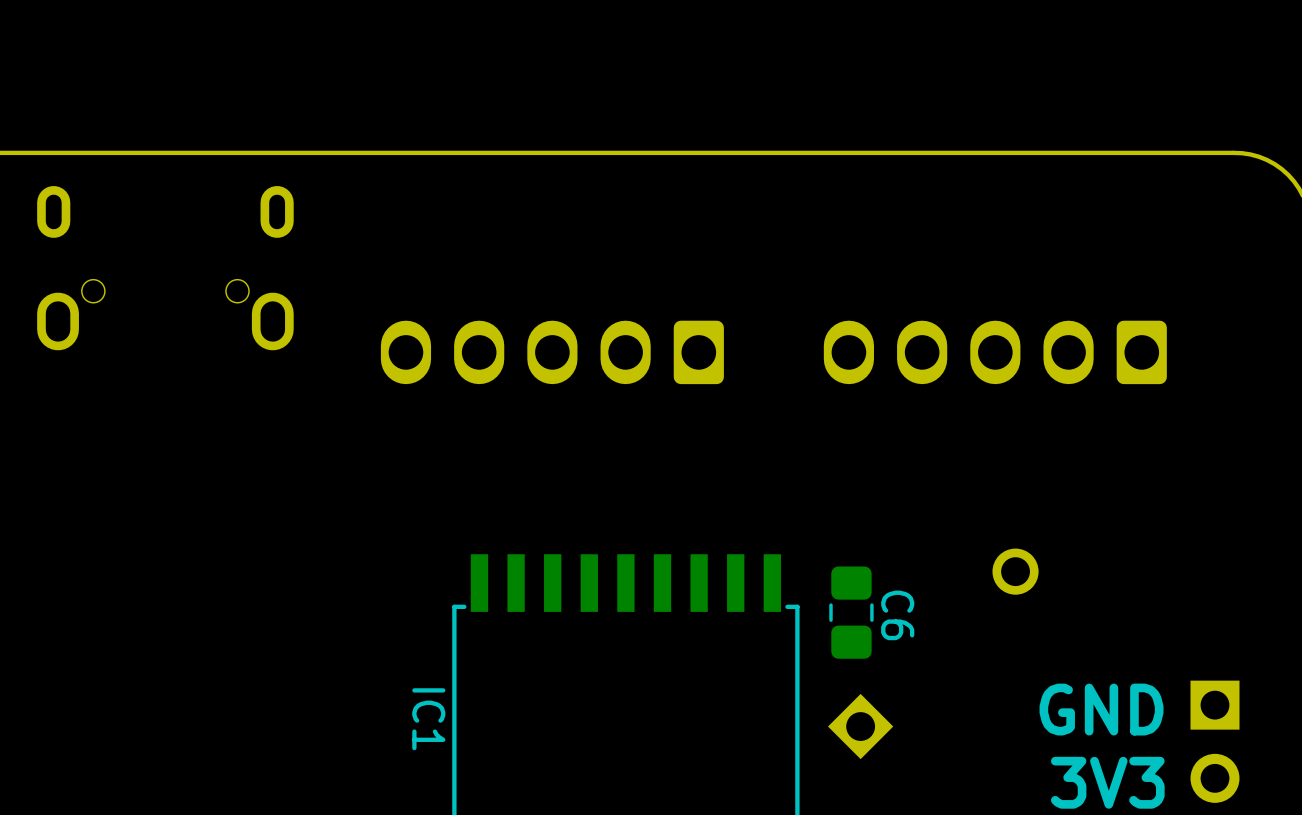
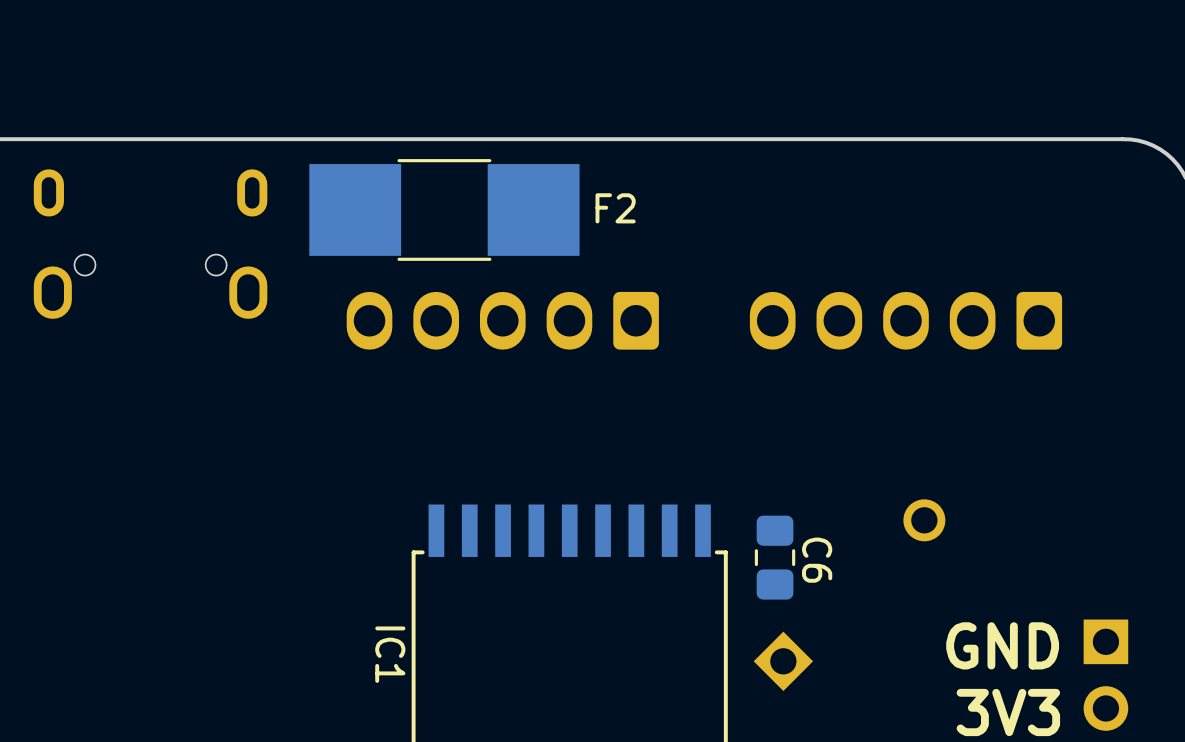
F2: none -> (444, 209)

